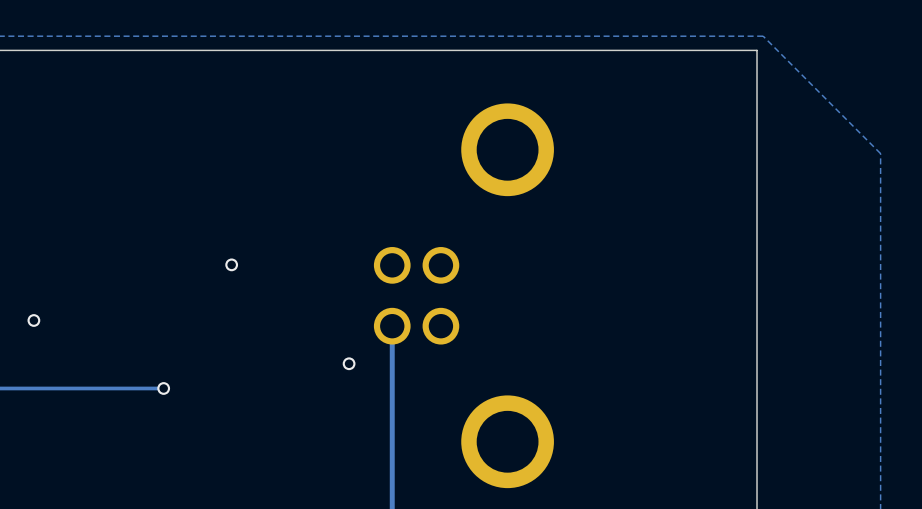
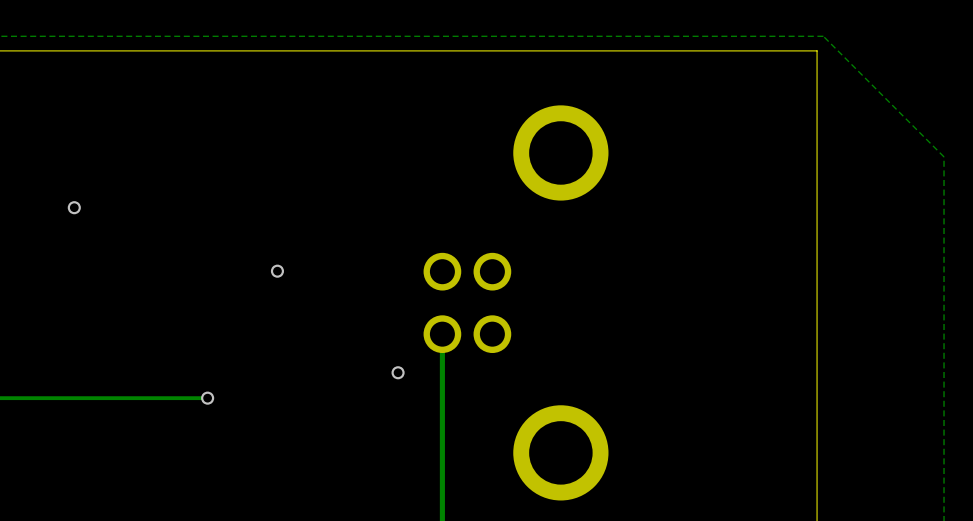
via position: (33, 320) -> (74, 207)

